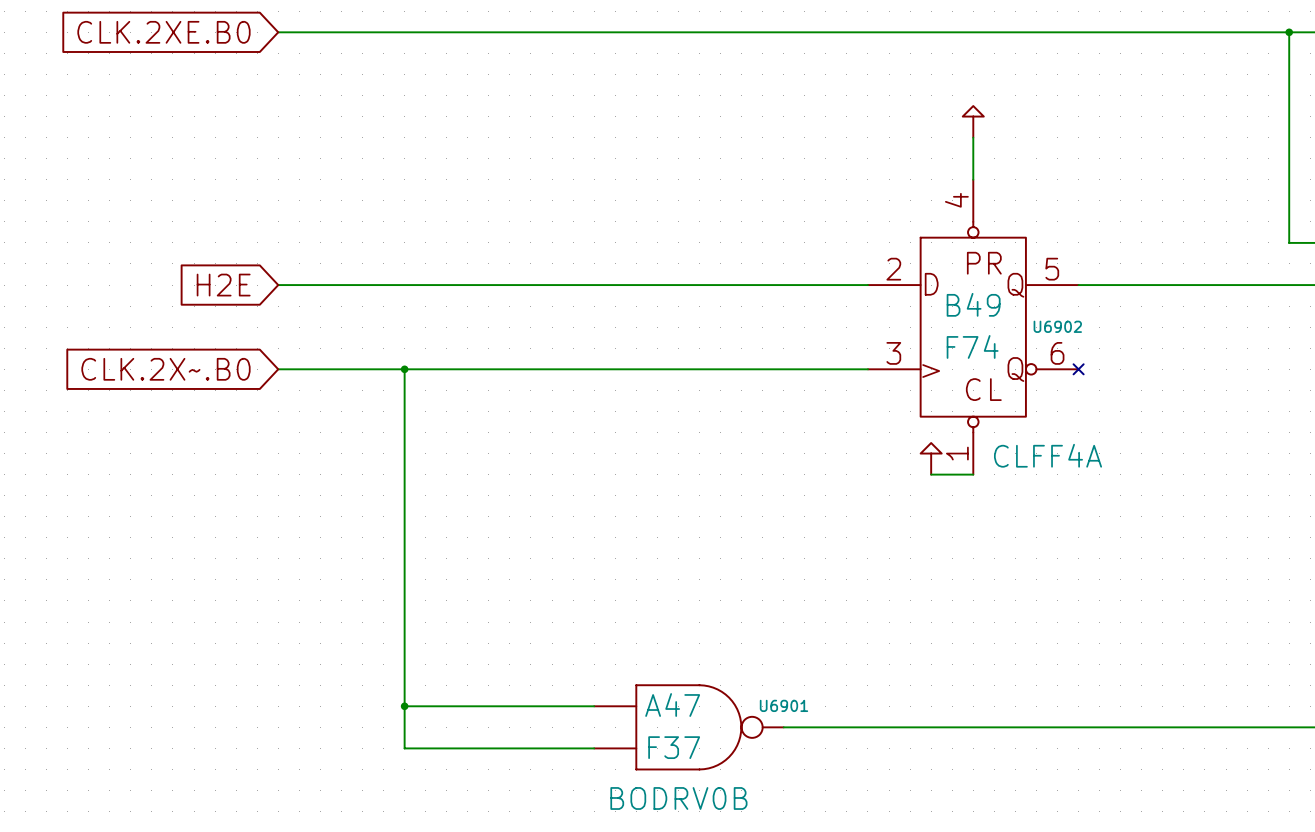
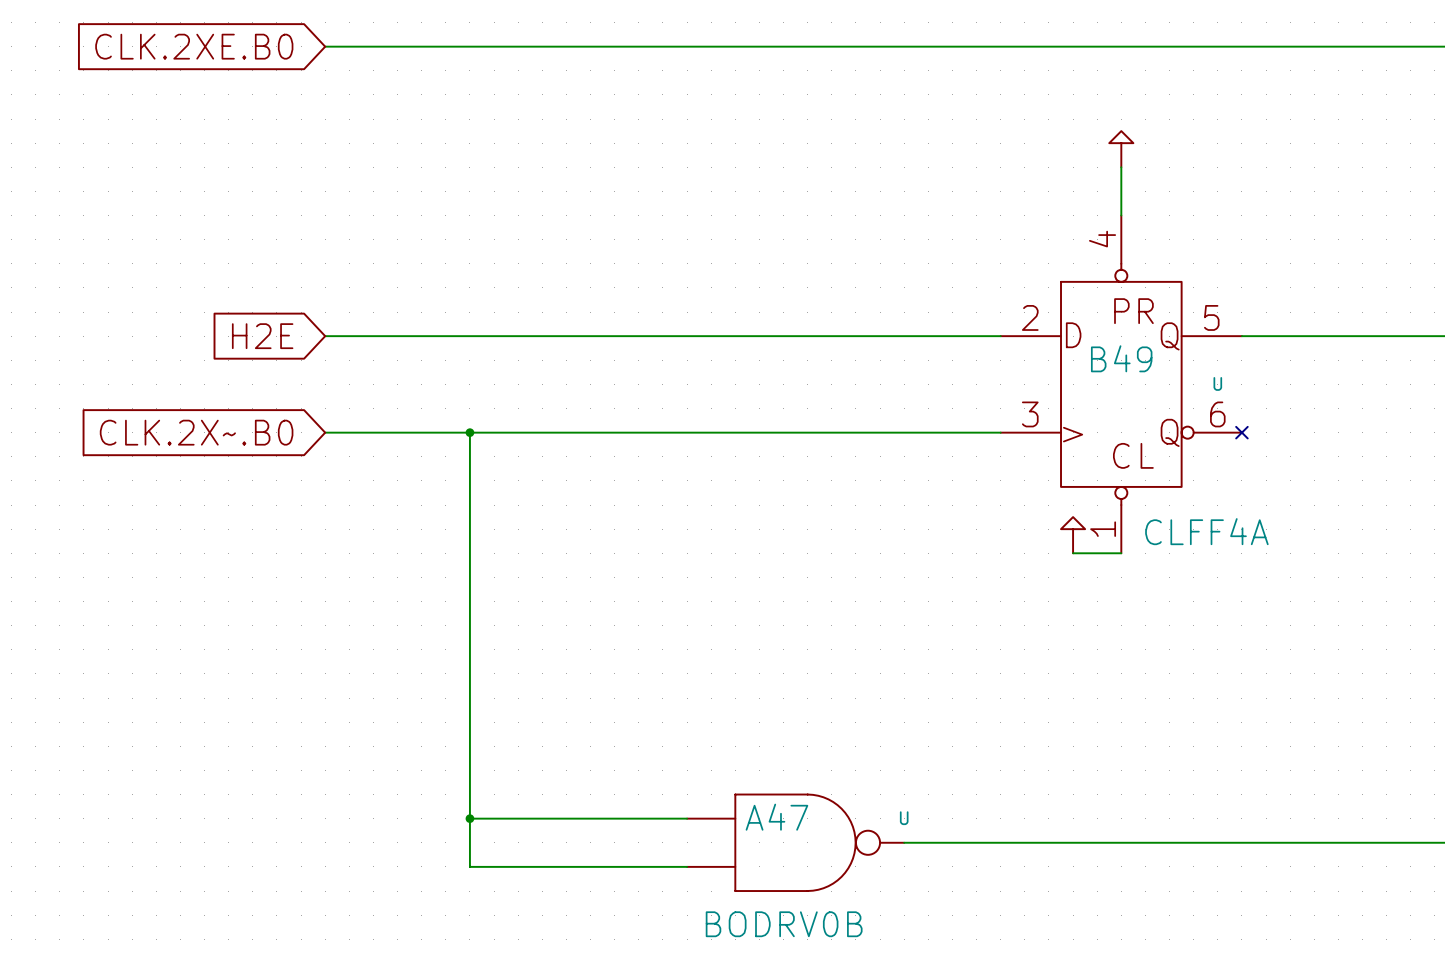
U6902 name: U6902 (1057, 326) -> U (1217, 383)
U6902 value: F74 (972, 346) -> none
U6901 name: U6901 (783, 705) -> U (904, 818)
U6901 value: F37 (674, 747) -> none

